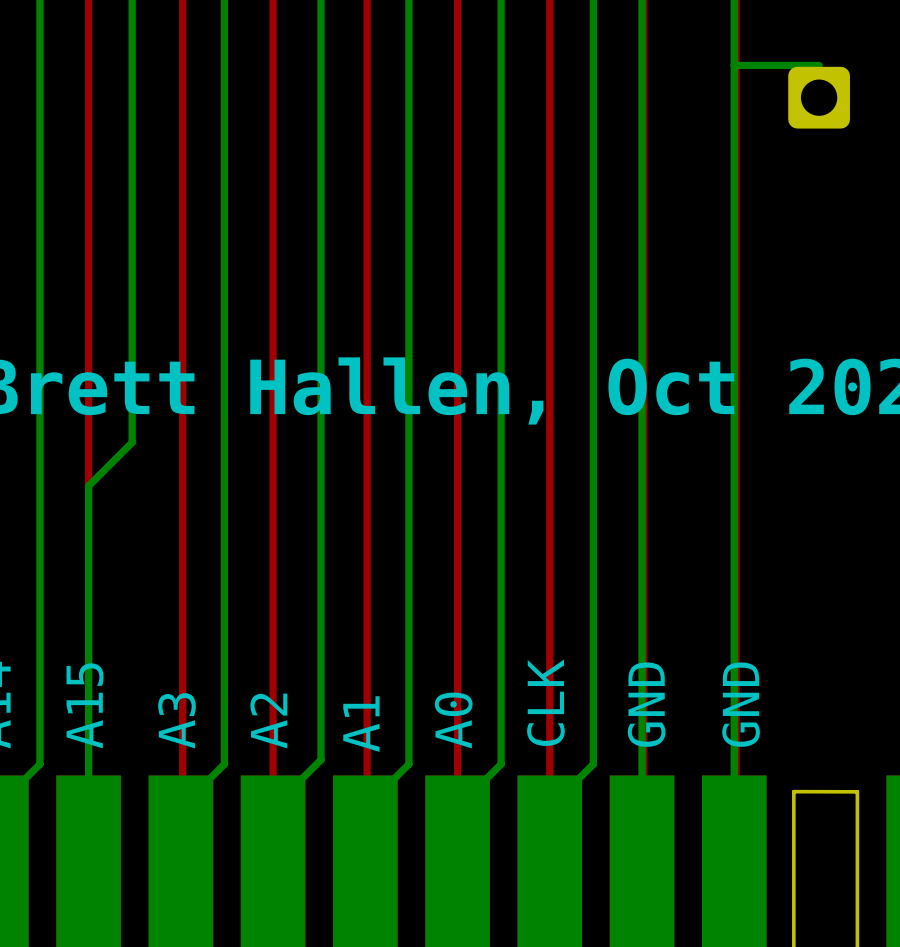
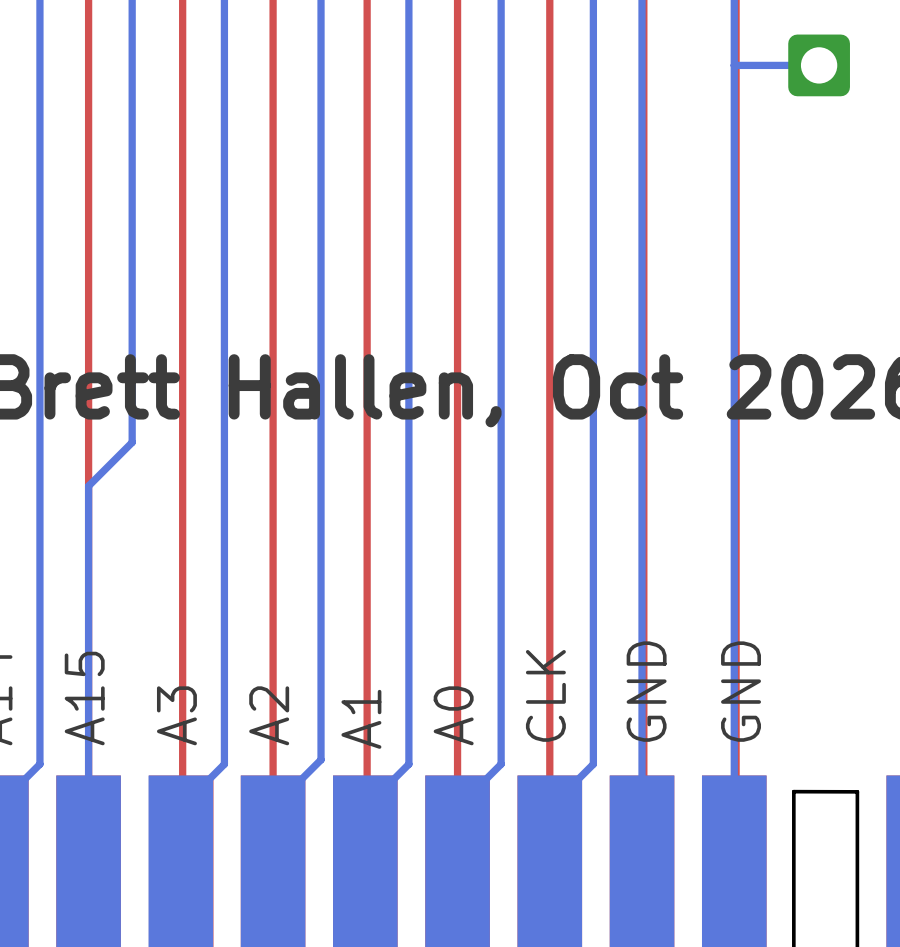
part position: (819, 97) -> (819, 65)

